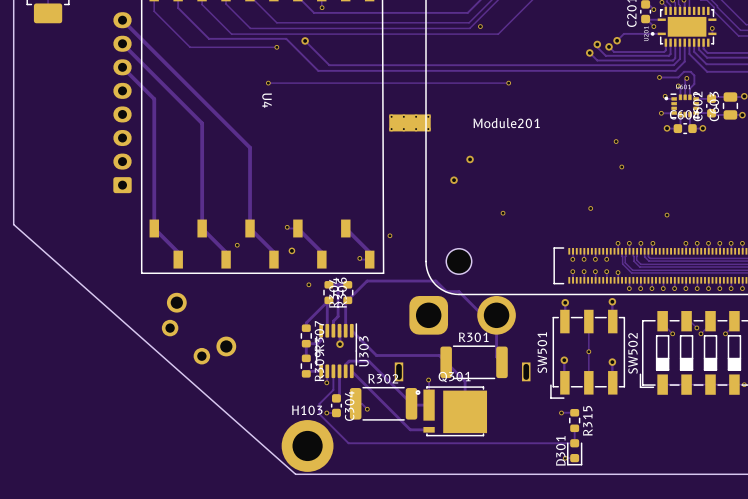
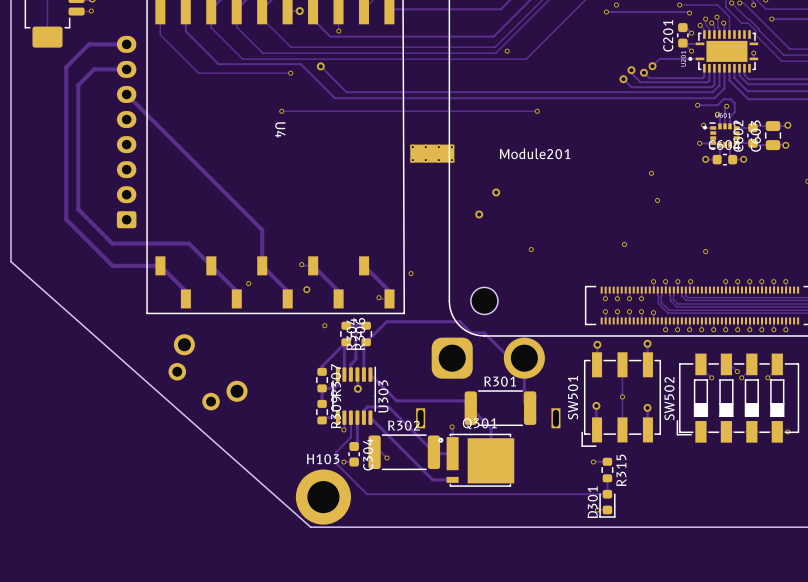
track: (122, 20) (250, 147) (250, 194) -> (160, 128) (262, 230)
track: (122, 43) (202, 123) (202, 228) -> (126, 69) (94, 69) (78, 85) (78, 209) (112, 243) (189, 243) (211, 265)
track: (154, 99) (154, 228) -> (126, 44) (89, 44) (66, 67) (66, 219) (112, 265) (160, 265)

